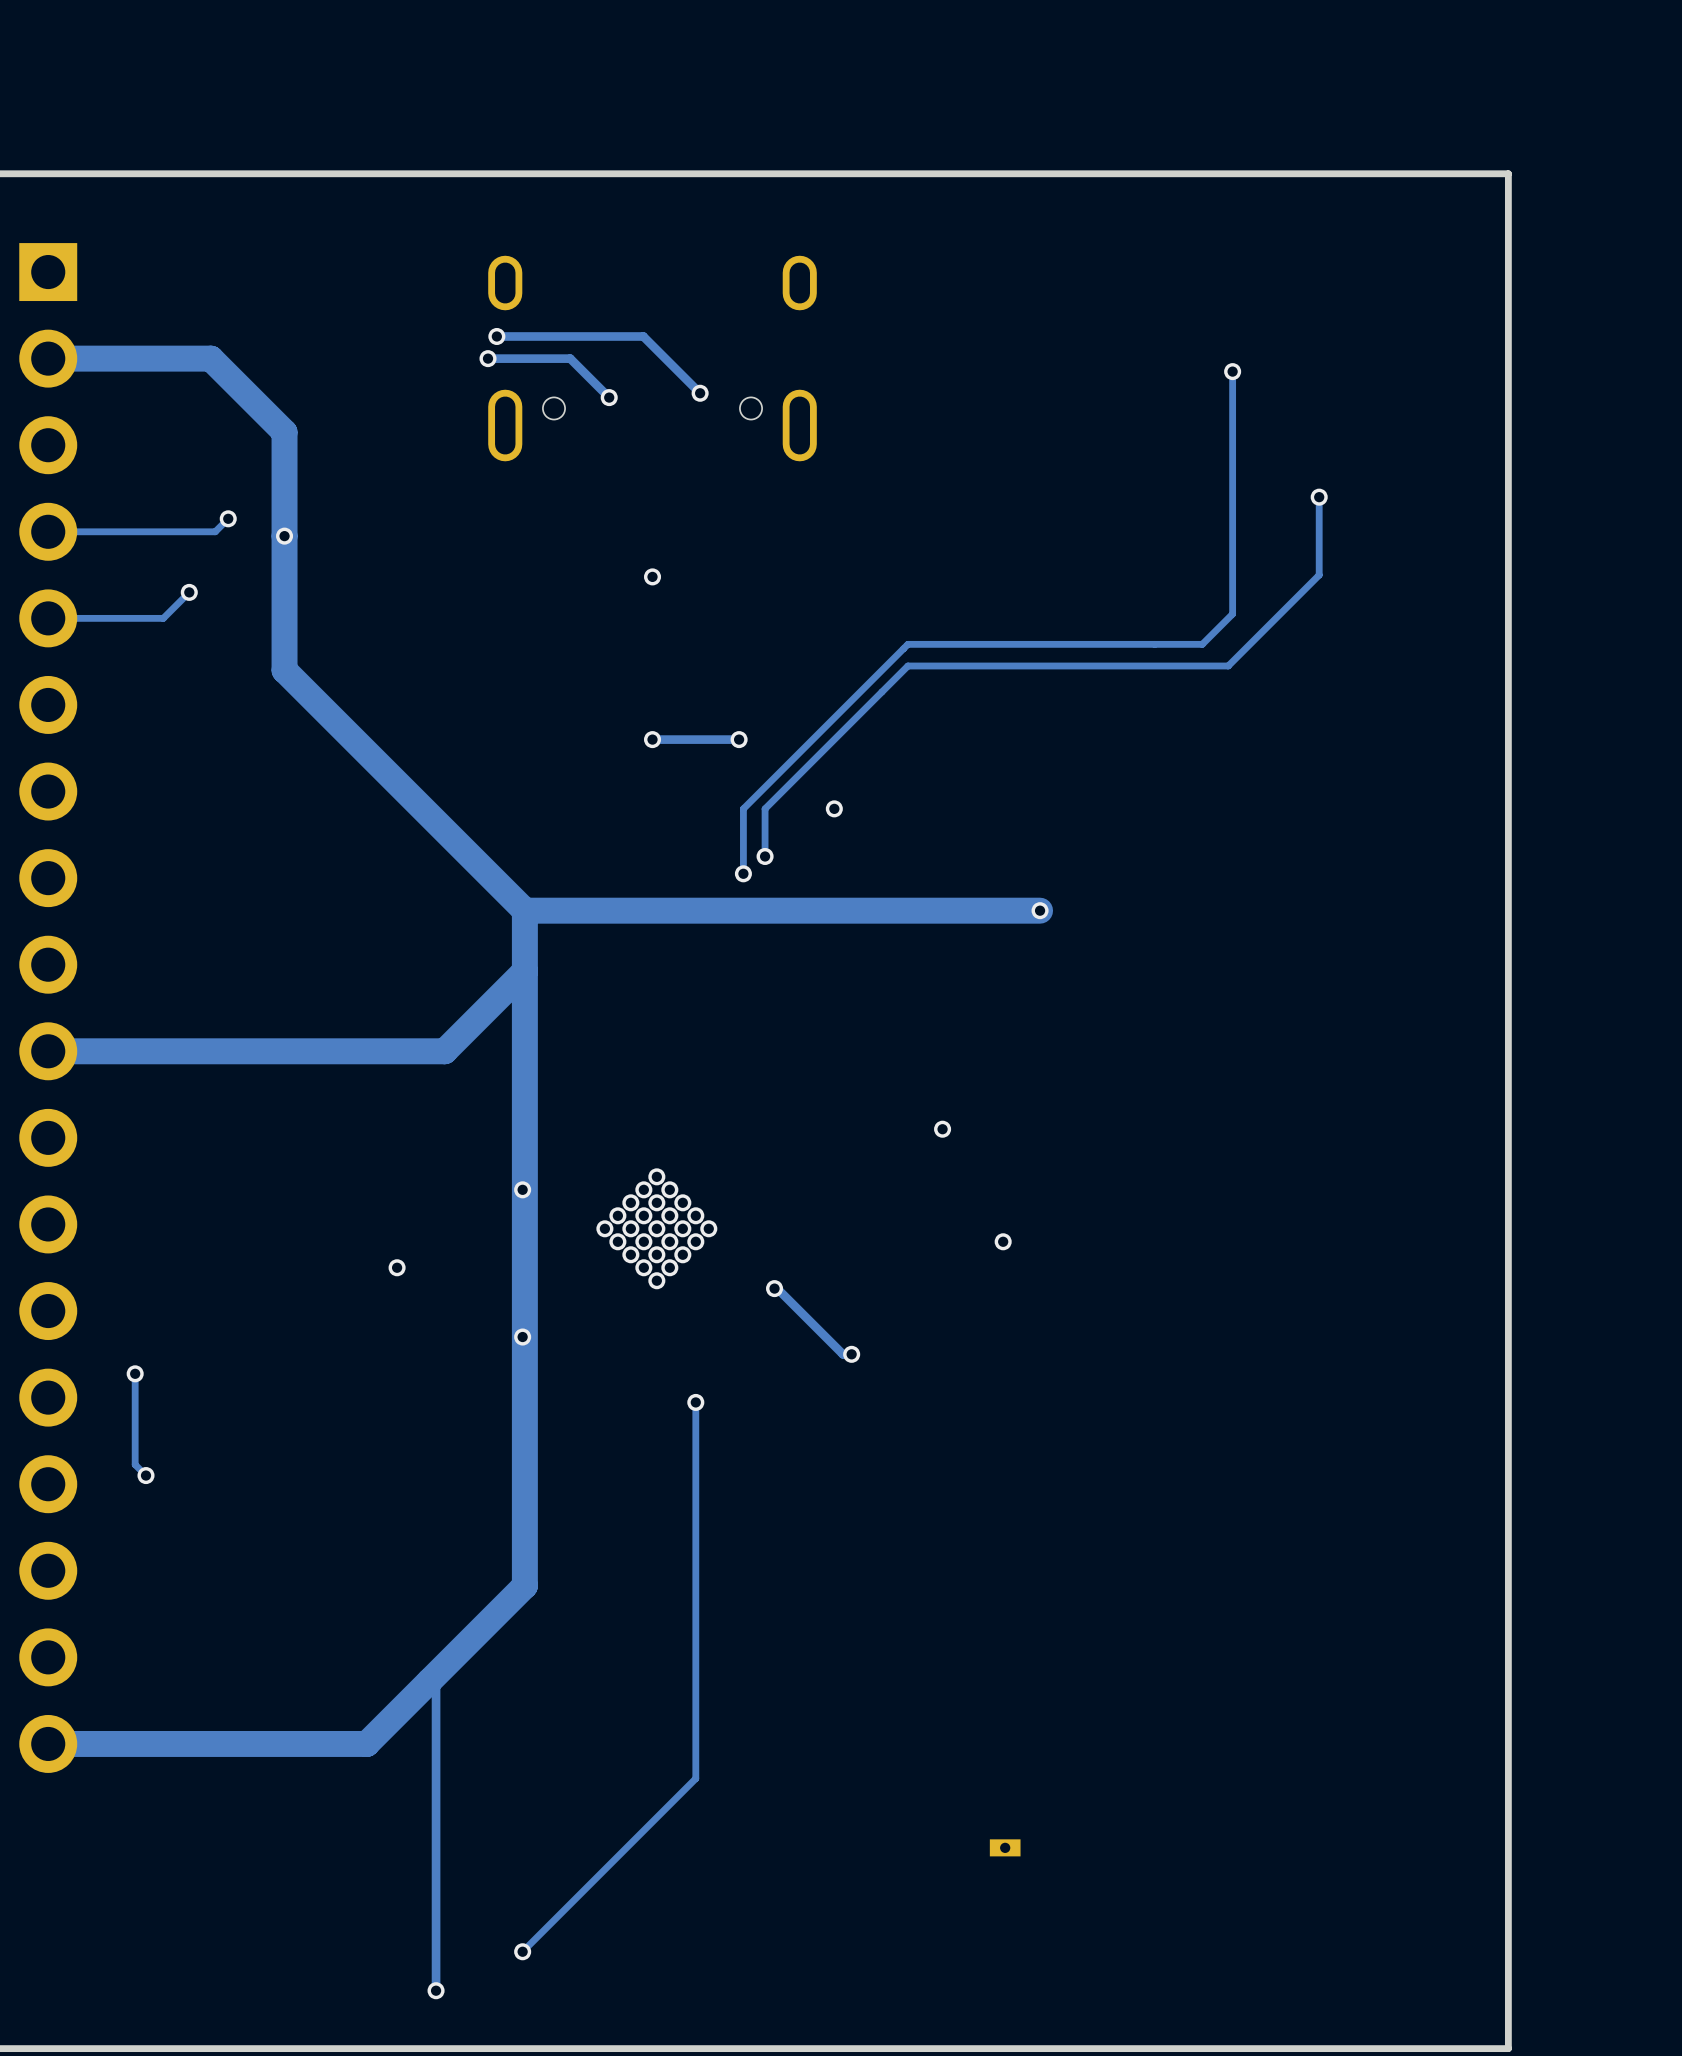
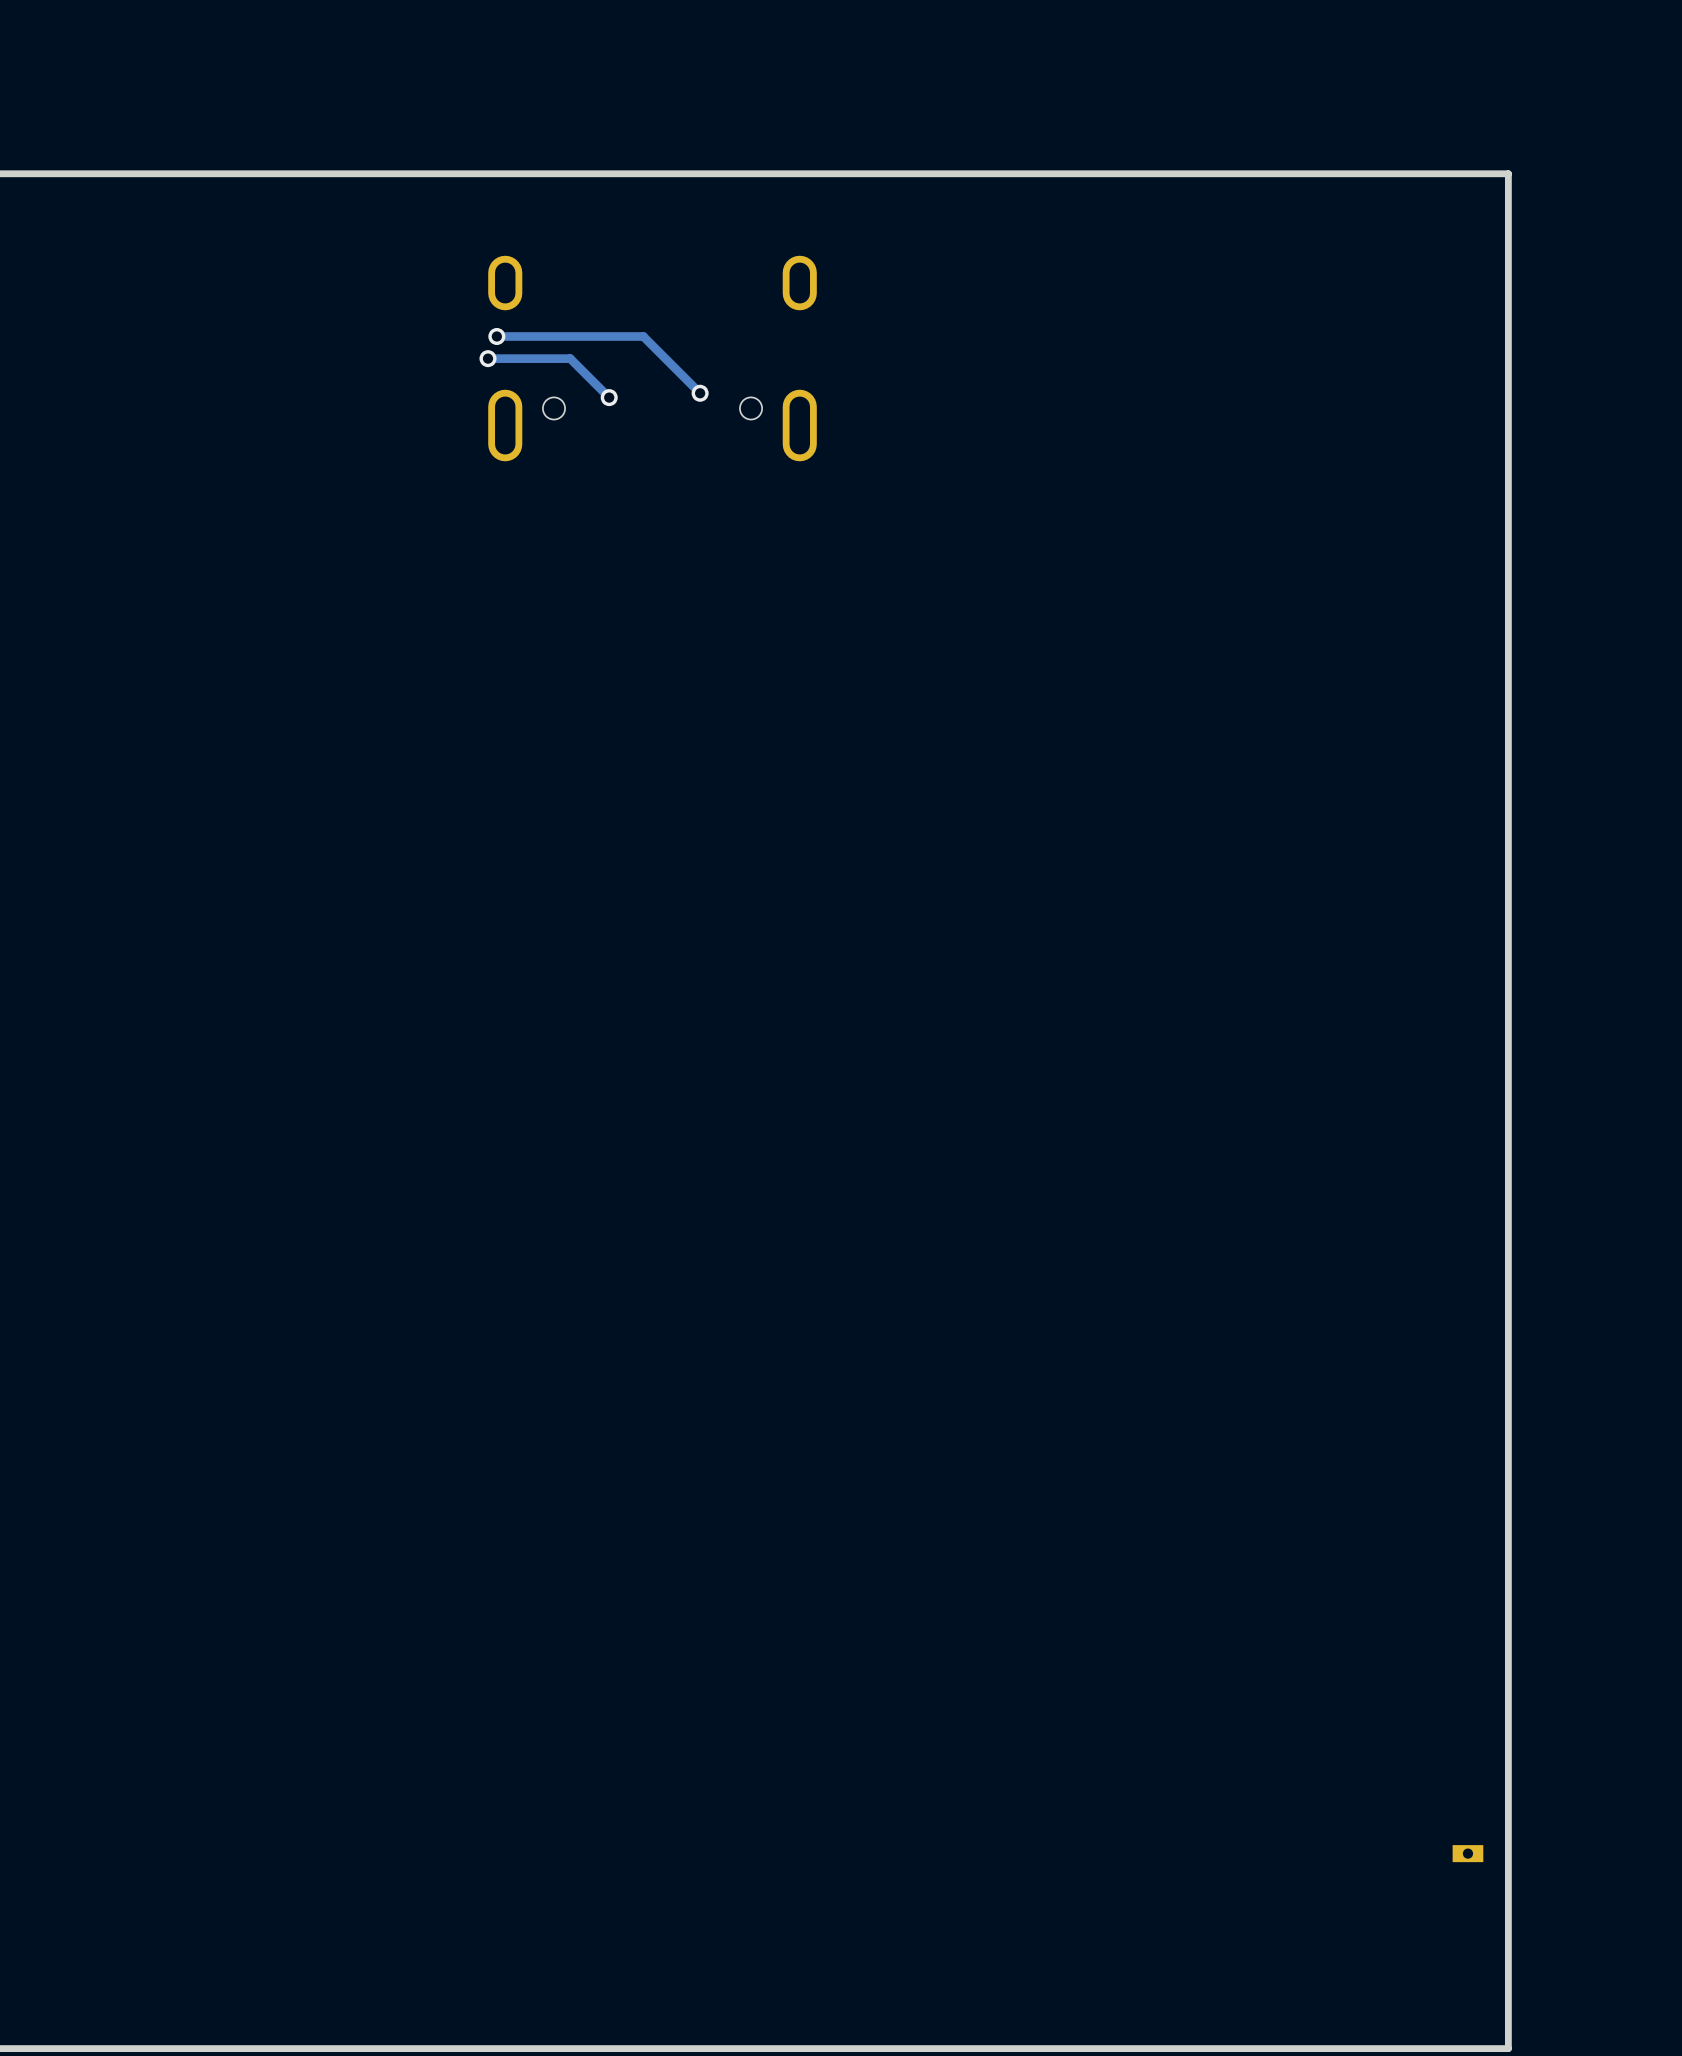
track: (48, 358) (210, 358) (284, 432) (284, 670) (524, 910) -> none
track: (1232, 371) (1232, 614) (1202, 644) (907, 644) (743, 808) (743, 873) -> none
via: (1232, 371) -> none
track: (1319, 497) (1319, 575) (1228, 666) (907, 666) (765, 808) (765, 856) -> none
via: (1319, 497) -> none
track: (228, 518) (215, 531) (48, 531) -> none
via: (228, 518) -> none
via: (284, 536) -> none
via: (652, 576) -> none
track: (189, 592) (163, 618) (48, 618) -> none
via: (189, 592) -> none
via: (652, 739) -> none
track: (739, 739) (652, 739) -> none
via: (739, 739) -> none
via: (834, 808) -> none
via: (765, 856) -> none
via: (743, 873) -> none
track: (524, 910) (524, 1585) (366, 1743) (48, 1743) -> none
track: (1040, 910) (524, 910) -> none
via: (1040, 910) -> none
track: (524, 971) (444, 1051) (48, 1051) -> none
part: (48, 1008) -> none
via: (942, 1129) -> none
via: (656, 1176) -> none
via: (522, 1189) -> none
via: (643, 1189) -> none
via: (669, 1189) -> none
via: (630, 1202) -> none
via: (656, 1202) -> none
via: (682, 1202) -> none
via: (617, 1215) -> none
via: (643, 1215) -> none
via: (669, 1215) -> none
via: (695, 1215) -> none
via: (604, 1228) -> none
via: (630, 1228) -> none
via: (656, 1228) -> none
via: (682, 1228) -> none
via: (708, 1228) -> none
via: (617, 1241) -> none
via: (643, 1241) -> none
via: (669, 1241) -> none
via: (695, 1241) -> none
via: (1003, 1241) -> none
via: (630, 1254) -> none
via: (656, 1254) -> none
via: (682, 1254) -> none
via: (397, 1267) -> none
via: (643, 1267) -> none
via: (669, 1267) -> none
via: (656, 1280) -> none
track: (774, 1288) (777, 1288) (842, 1354) (851, 1354) -> none
via: (774, 1288) -> none
via: (522, 1337) -> none
via: (851, 1354) -> none
track: (135, 1373) (135, 1464) (146, 1475) -> none
via: (135, 1373) -> none
track: (695, 1402) (695, 1778) (522, 1951) -> none
via: (695, 1402) -> none
via: (146, 1475) -> none
track: (429, 1681) (436, 1687) (436, 1990) -> none
part position: (1005, 1847) -> (1467, 1853)
via: (522, 1951) -> none
via: (436, 1990) -> none

